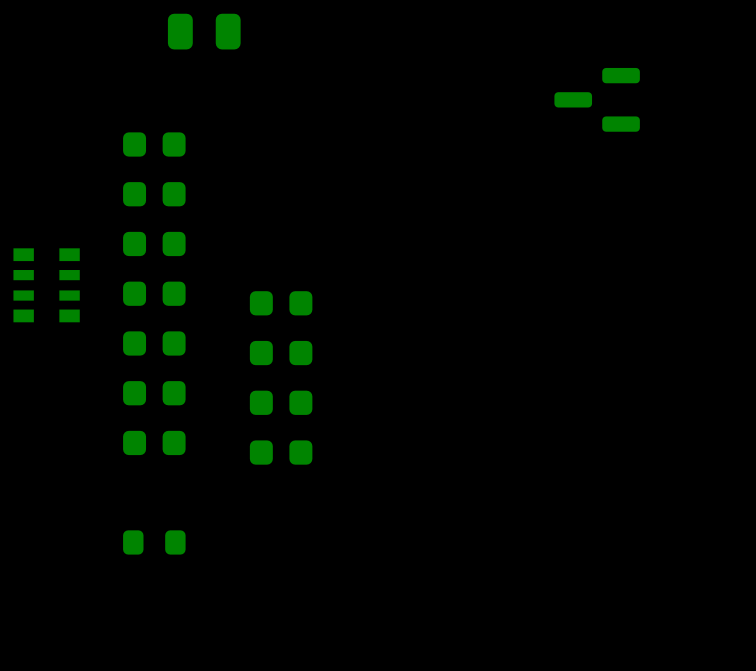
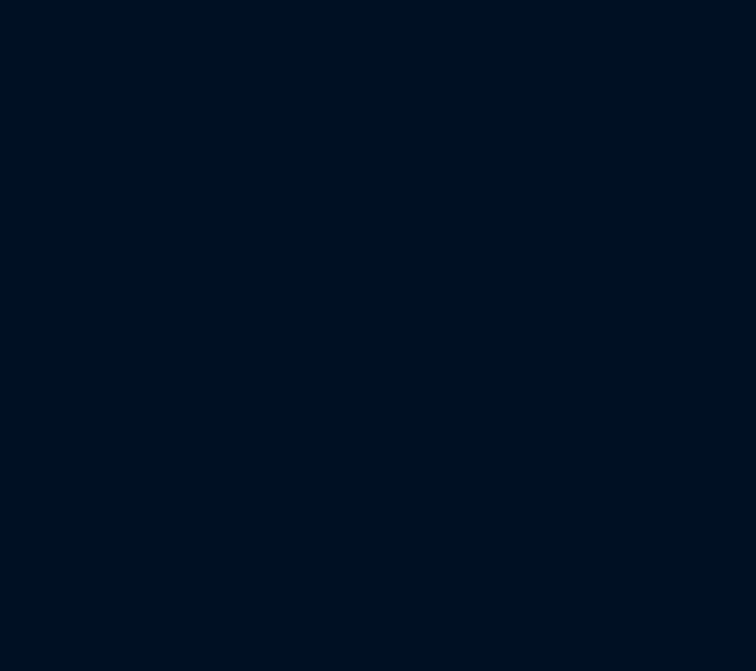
part: (204, 31) -> none
part: (597, 99) -> none
part: (154, 144) -> none
part: (154, 194) -> none
part: (154, 243) -> none
part: (46, 285) -> none
part: (154, 293) -> none
part: (281, 303) -> none
part: (154, 343) -> none
part: (281, 353) -> none
part: (154, 393) -> none
part: (281, 402) -> none
part: (154, 442) -> none
part: (281, 452) -> none
part: (154, 542) -> none

